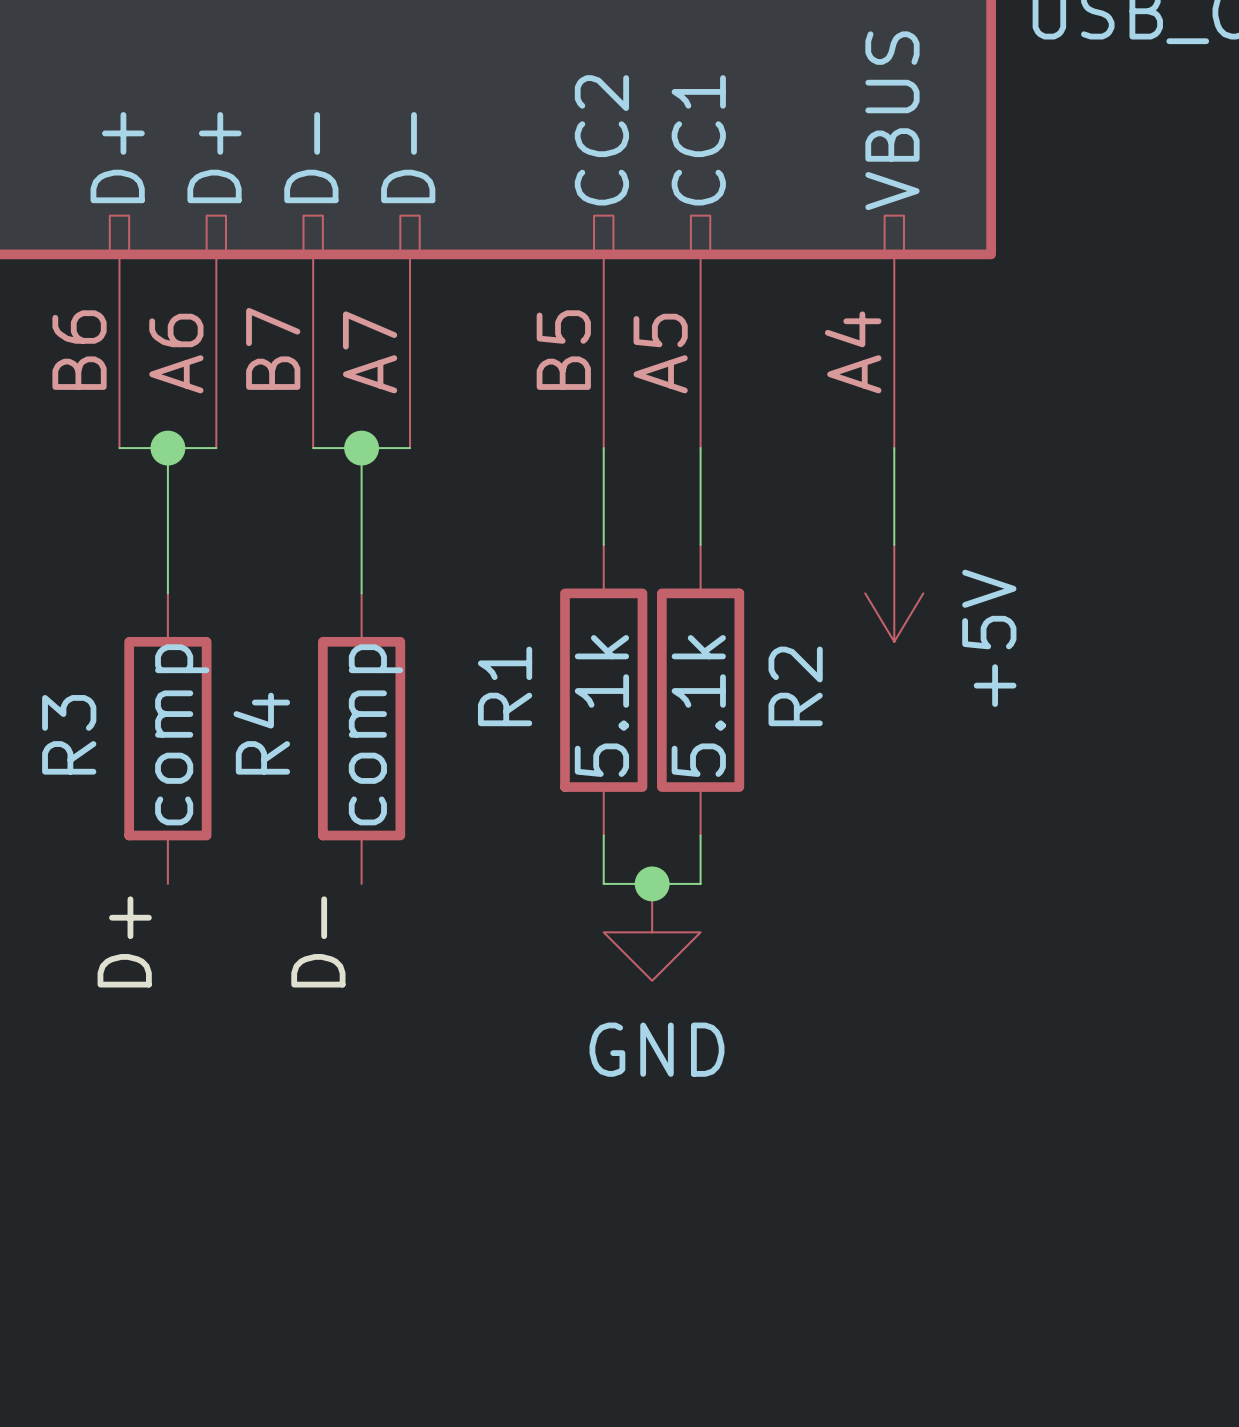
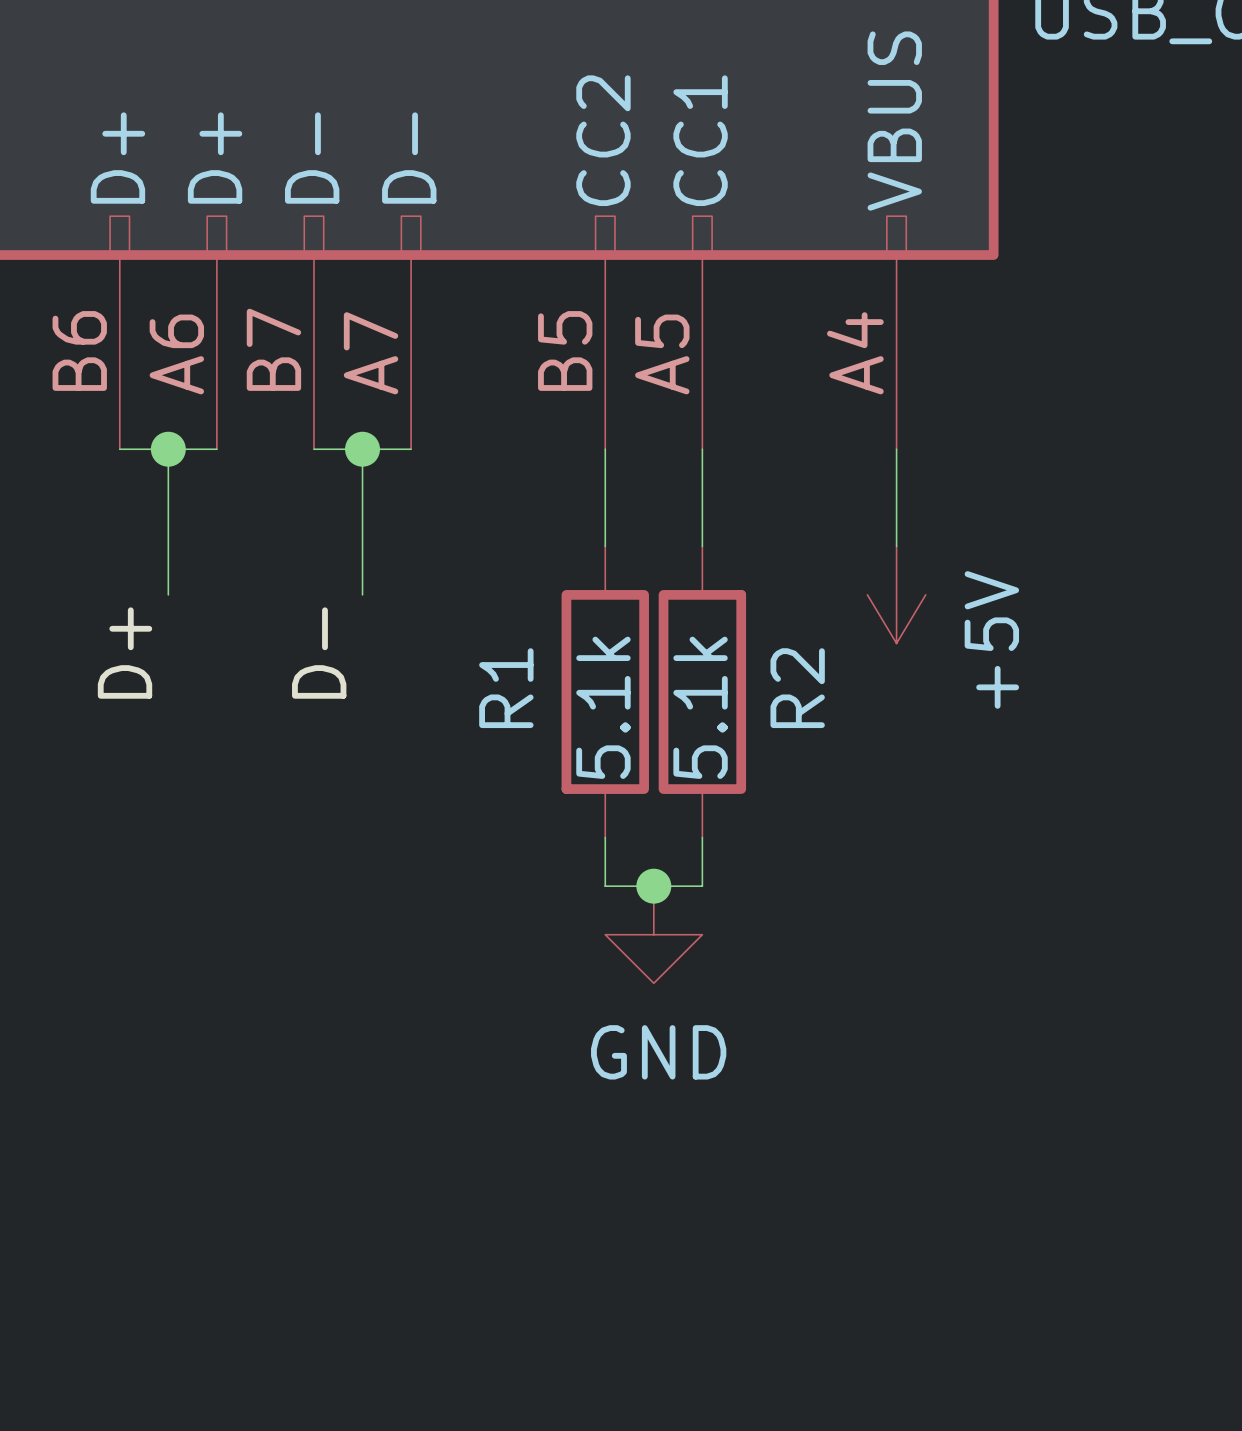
R3: comp (167, 738) -> none
R4: comp (361, 738) -> none
label position: D+ (124, 941) -> D+ (125, 653)
label position: D- (318, 941) -> D- (319, 653)

